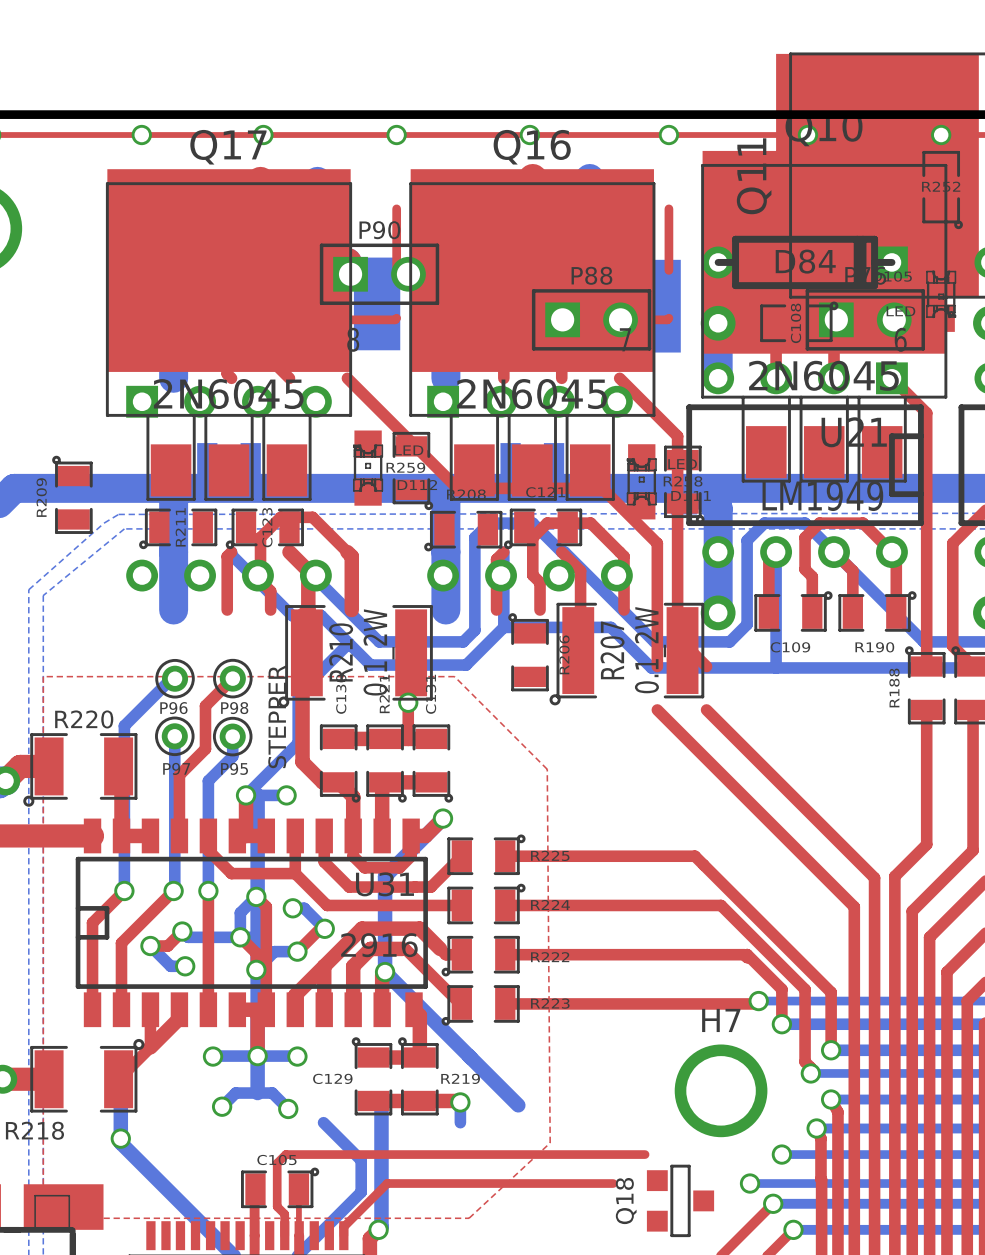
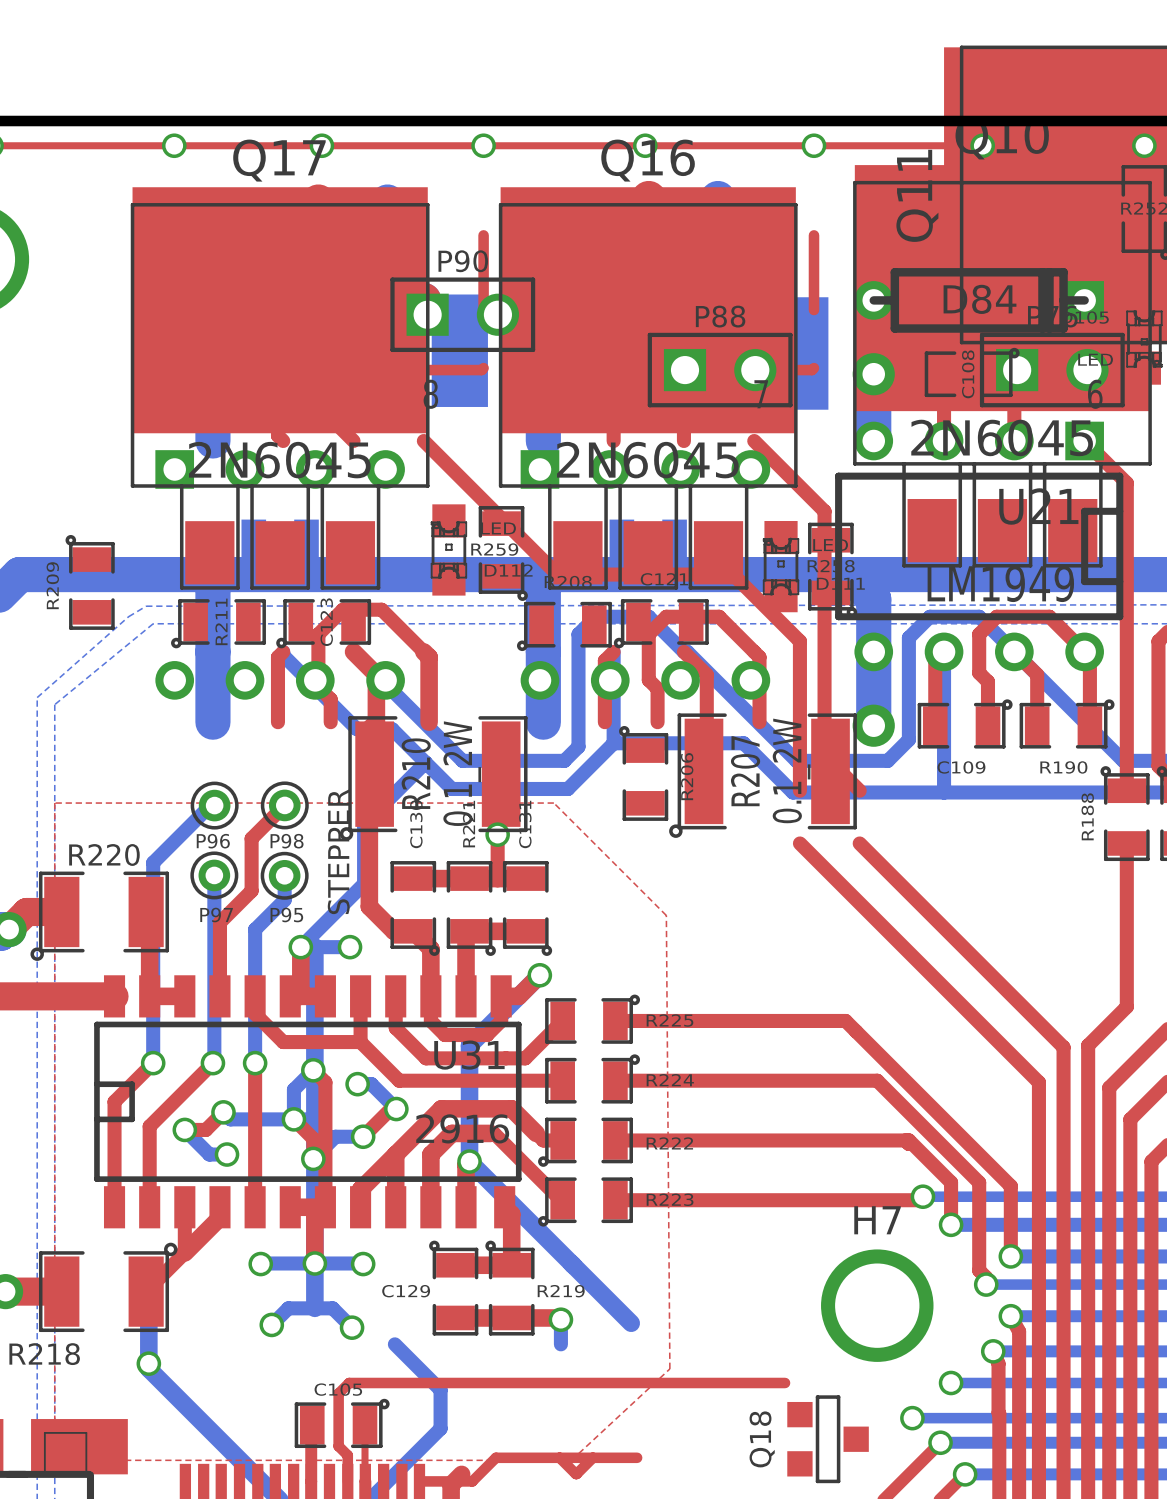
bottom track: (381, 1105) (381, 1226) (378, 1229) -> none
top track: (613, 1183) (387, 1183) (343, 1226) (343, 1235) -> (637, 1457) (495, 1457) (472, 1481) (419, 1481)
top track: none -> (559, 1457) (575, 1474) (592, 1457)
via: (378, 1229) -> none

